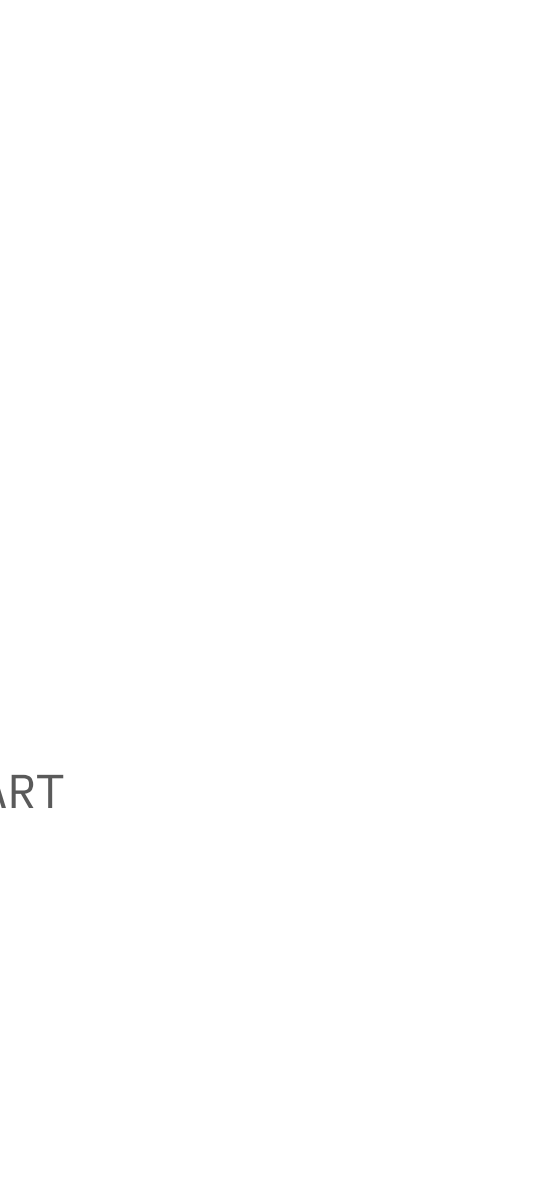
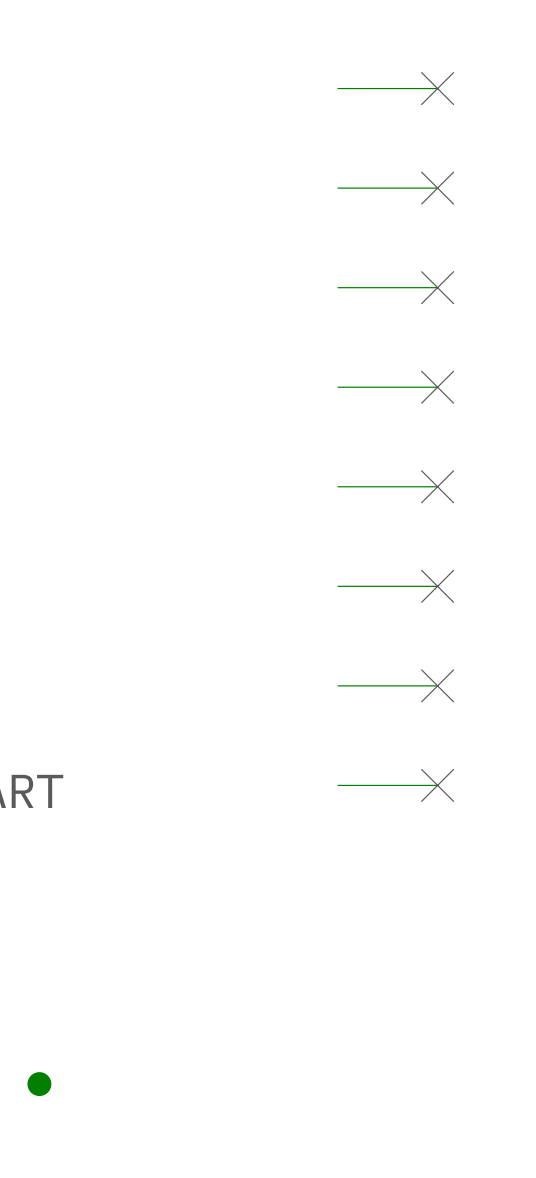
wire: none -> (338, 88) (437, 88)
no-connect mark: none -> (437, 88)
wire: none -> (338, 188) (437, 188)
no-connect mark: none -> (437, 188)
wire: none -> (338, 287) (437, 287)
no-connect mark: none -> (437, 287)
wire: none -> (338, 387) (437, 387)
no-connect mark: none -> (437, 387)
wire: none -> (338, 486) (437, 486)
no-connect mark: none -> (437, 486)
wire: none -> (338, 586) (437, 586)
no-connect mark: none -> (437, 586)
wire: none -> (338, 685) (437, 685)
no-connect mark: none -> (437, 685)
wire: none -> (338, 785) (437, 785)
no-connect mark: none -> (437, 785)
junction: none -> (39, 1084)

